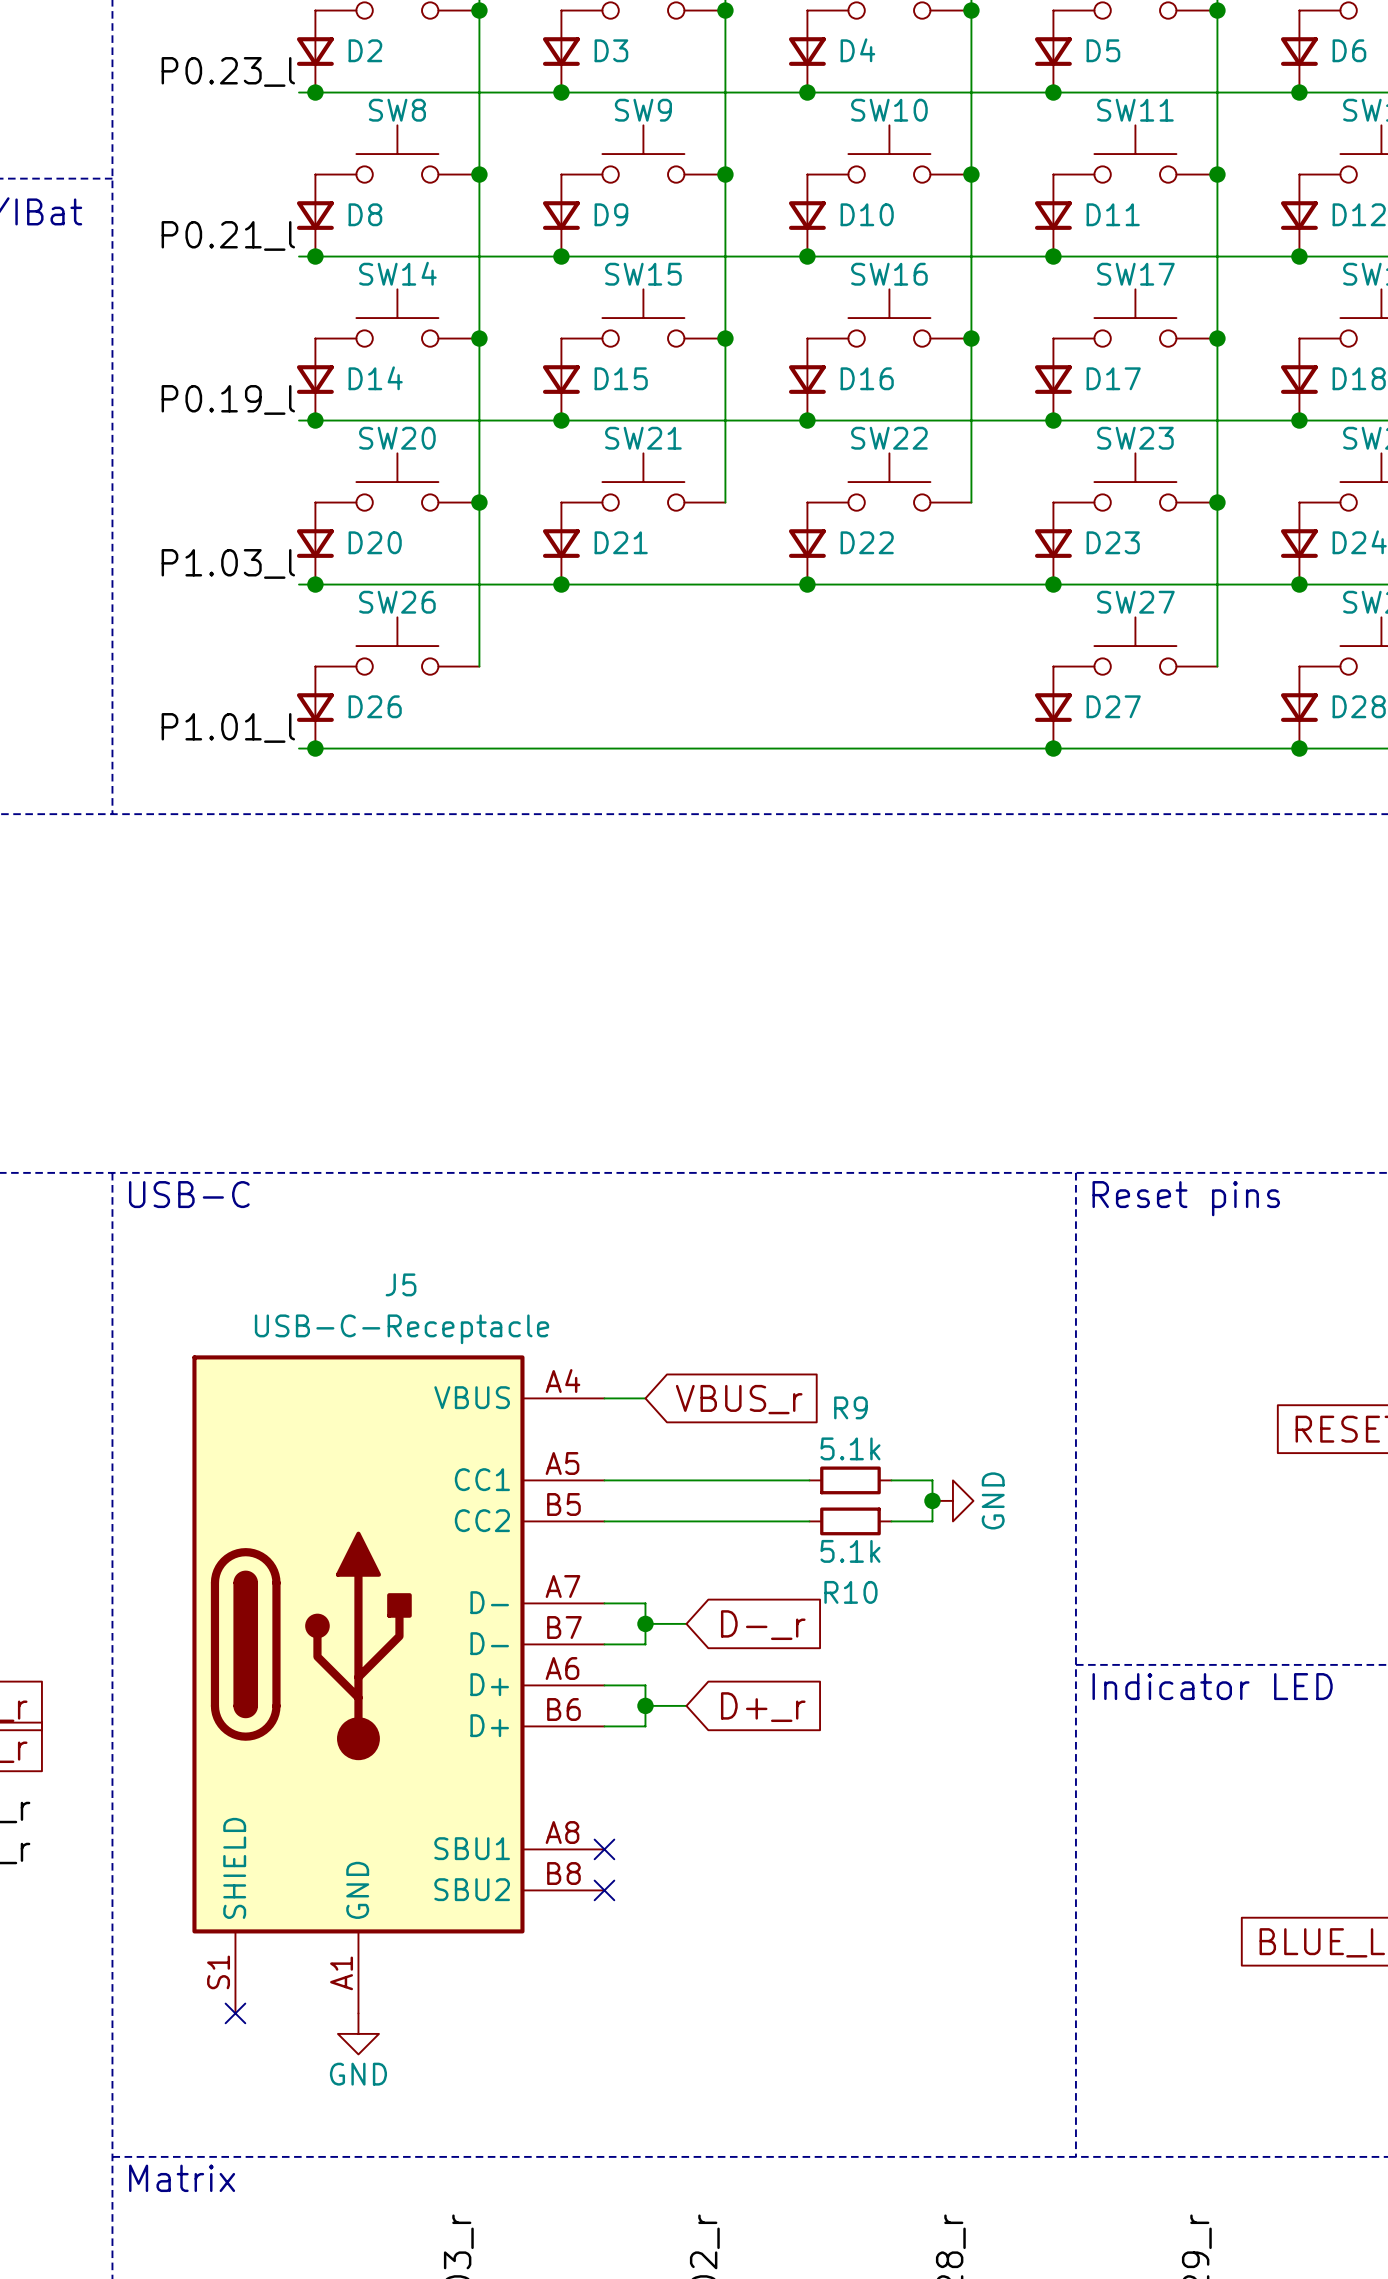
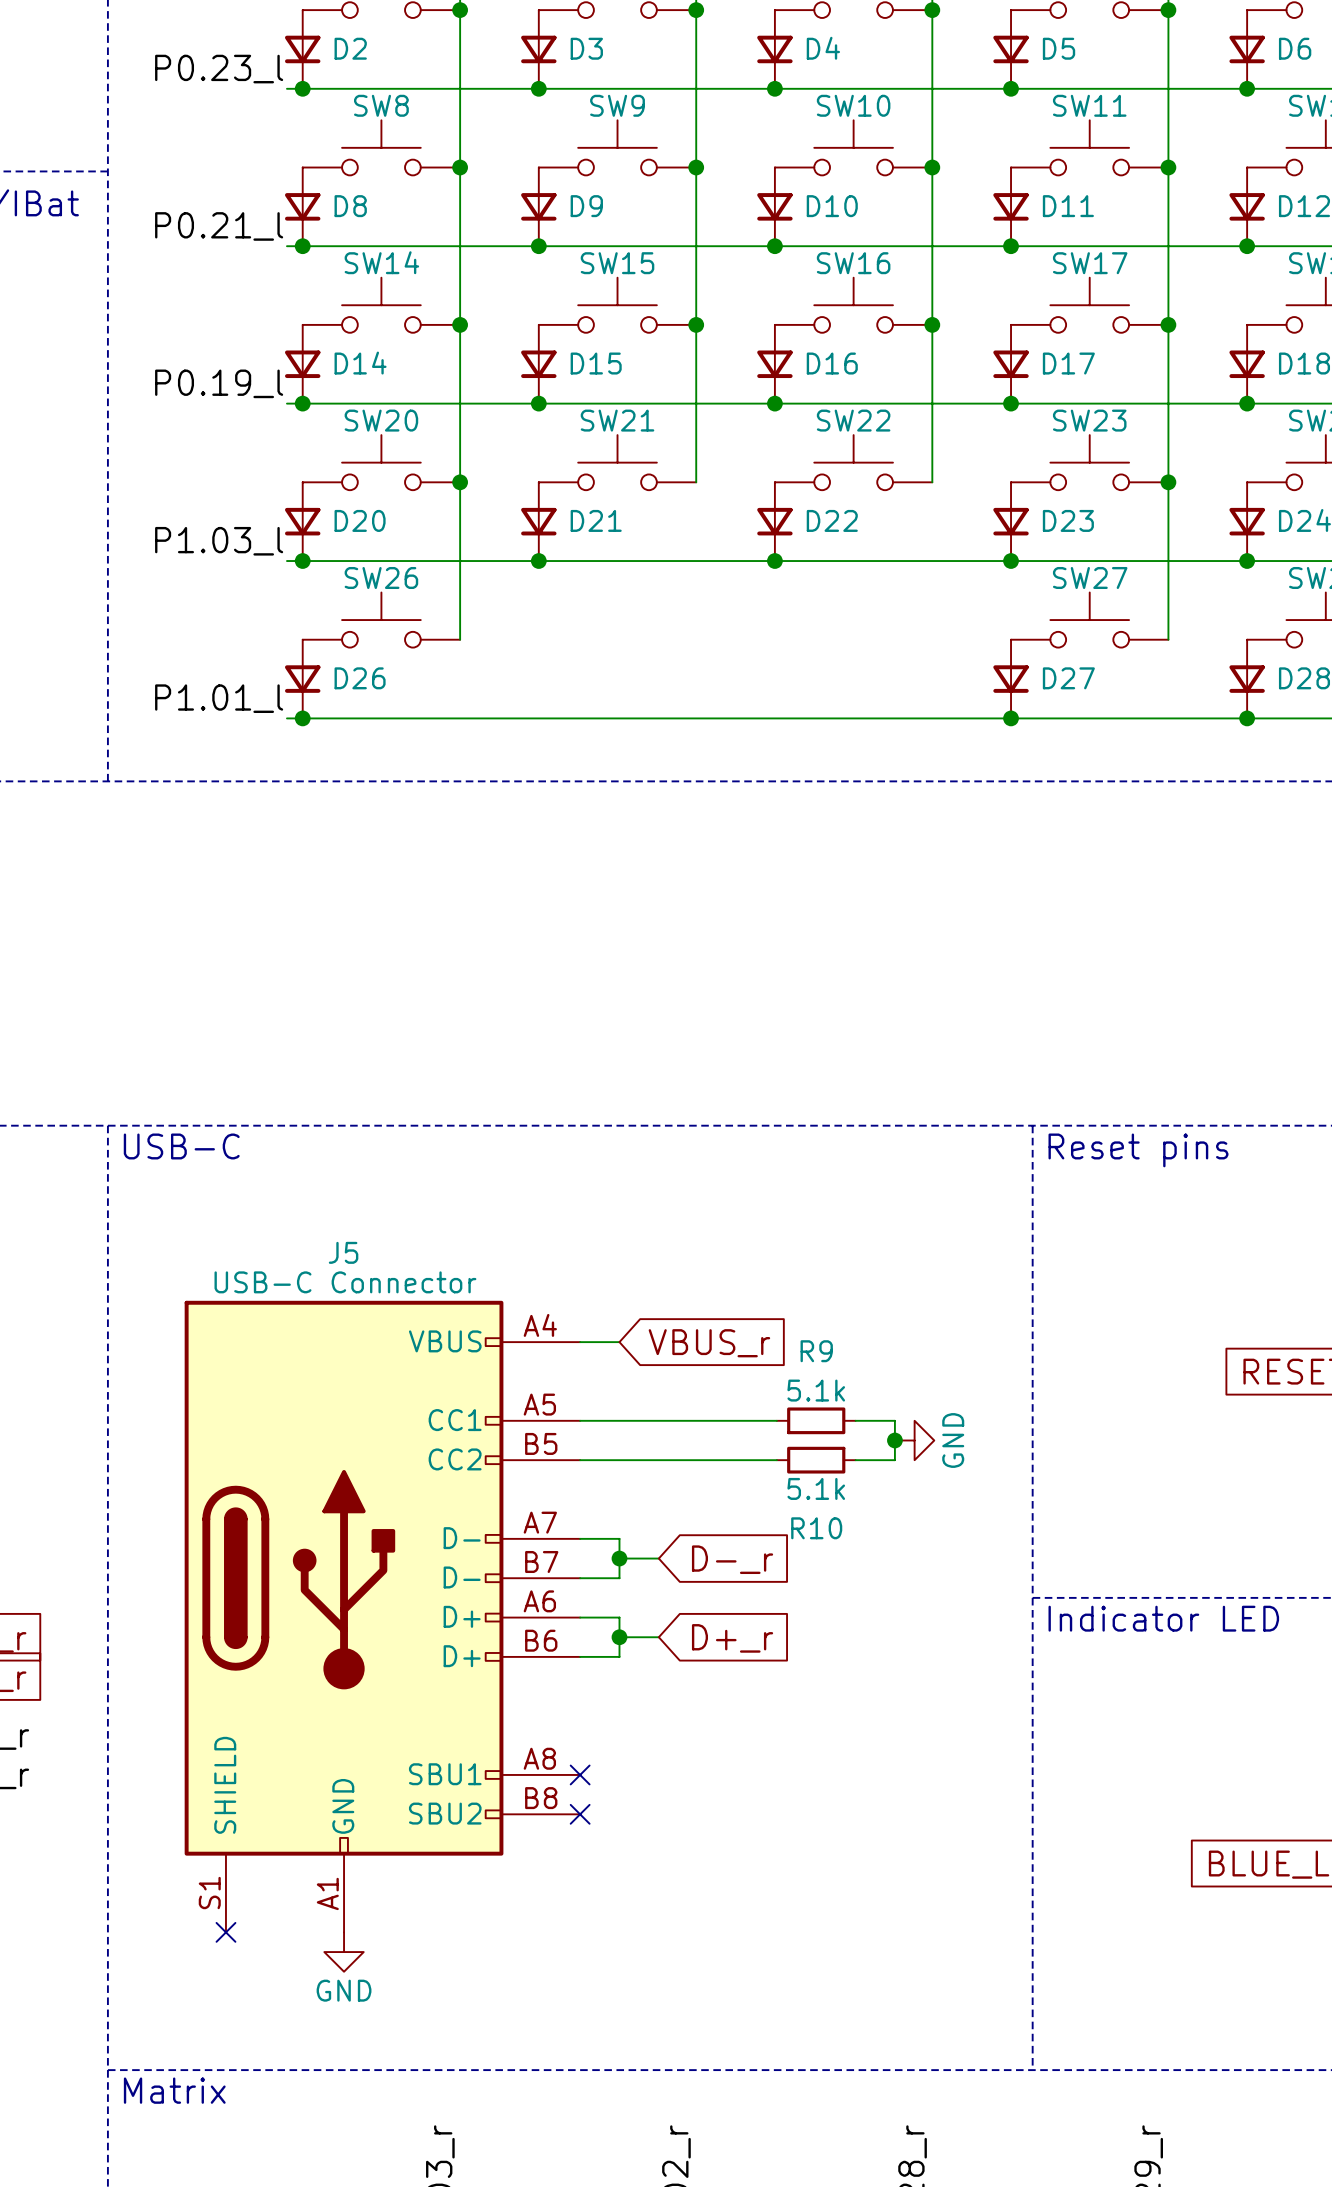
J5 name position: J5 (401, 1284) -> J5 (343, 1252)
J5 value: USB-C-Receptacle (402, 1329) -> USB-C Connector (345, 1282)
J5 symbol: [192, 1355, 605, 2014] -> [184, 1300, 581, 1933]

